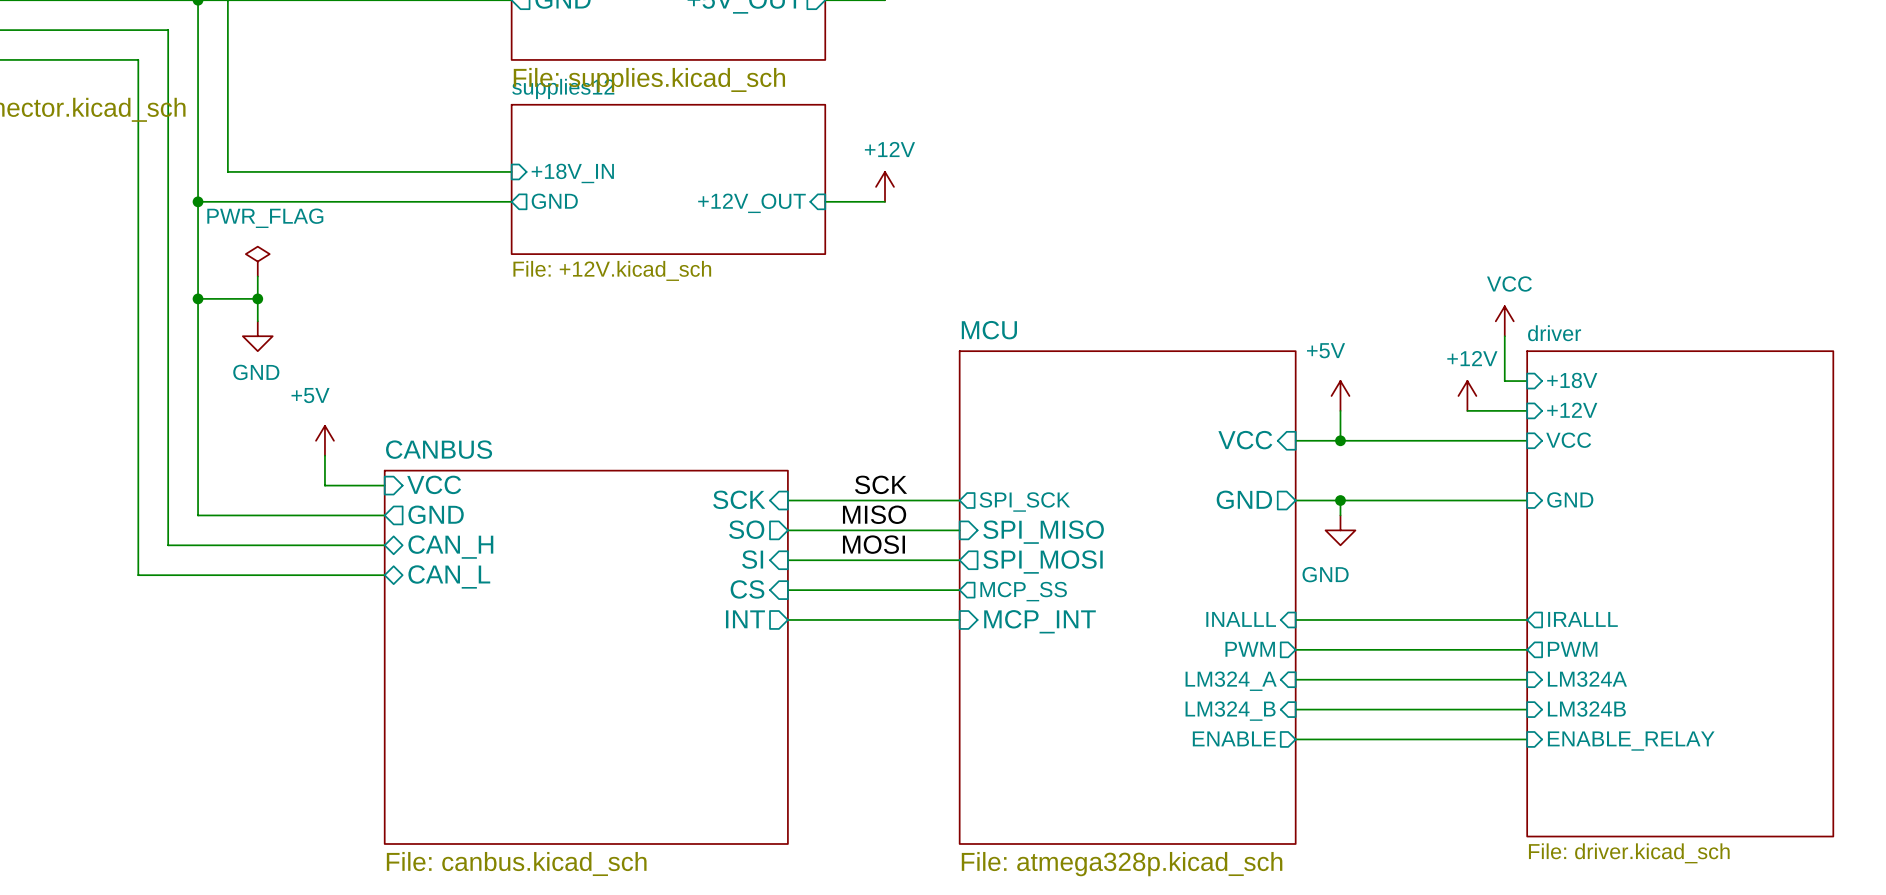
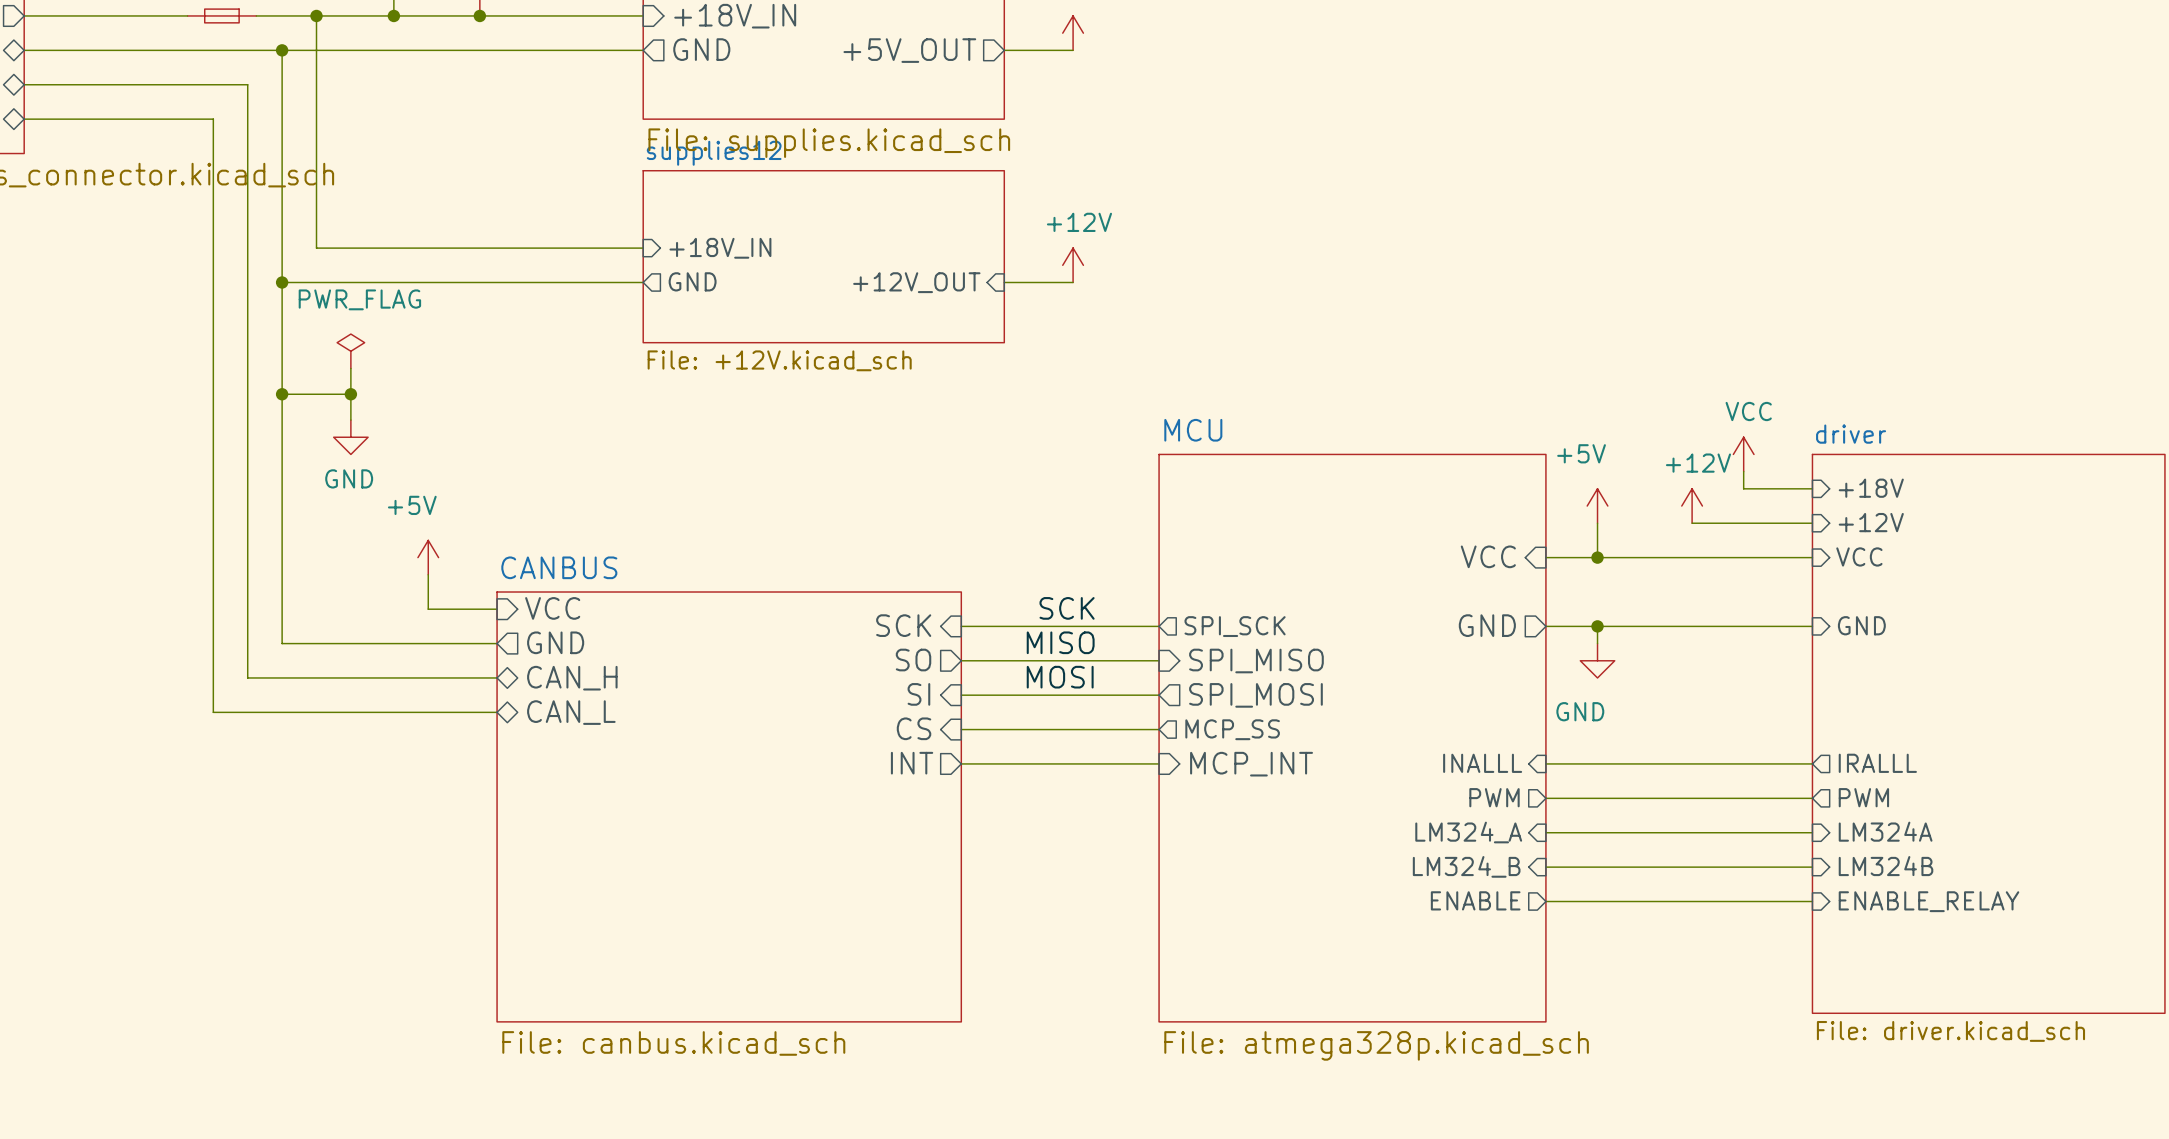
power symbol position: VCC (1504, 321) -> VCC (1743, 454)
wire: (1504, 336) (1504, 381) -> (1743, 471) (1743, 488) (1786, 488)
power symbol position: +12V (1467, 395) -> +12V (1692, 506)
wire: none -> (1692, 523) (1743, 523)

